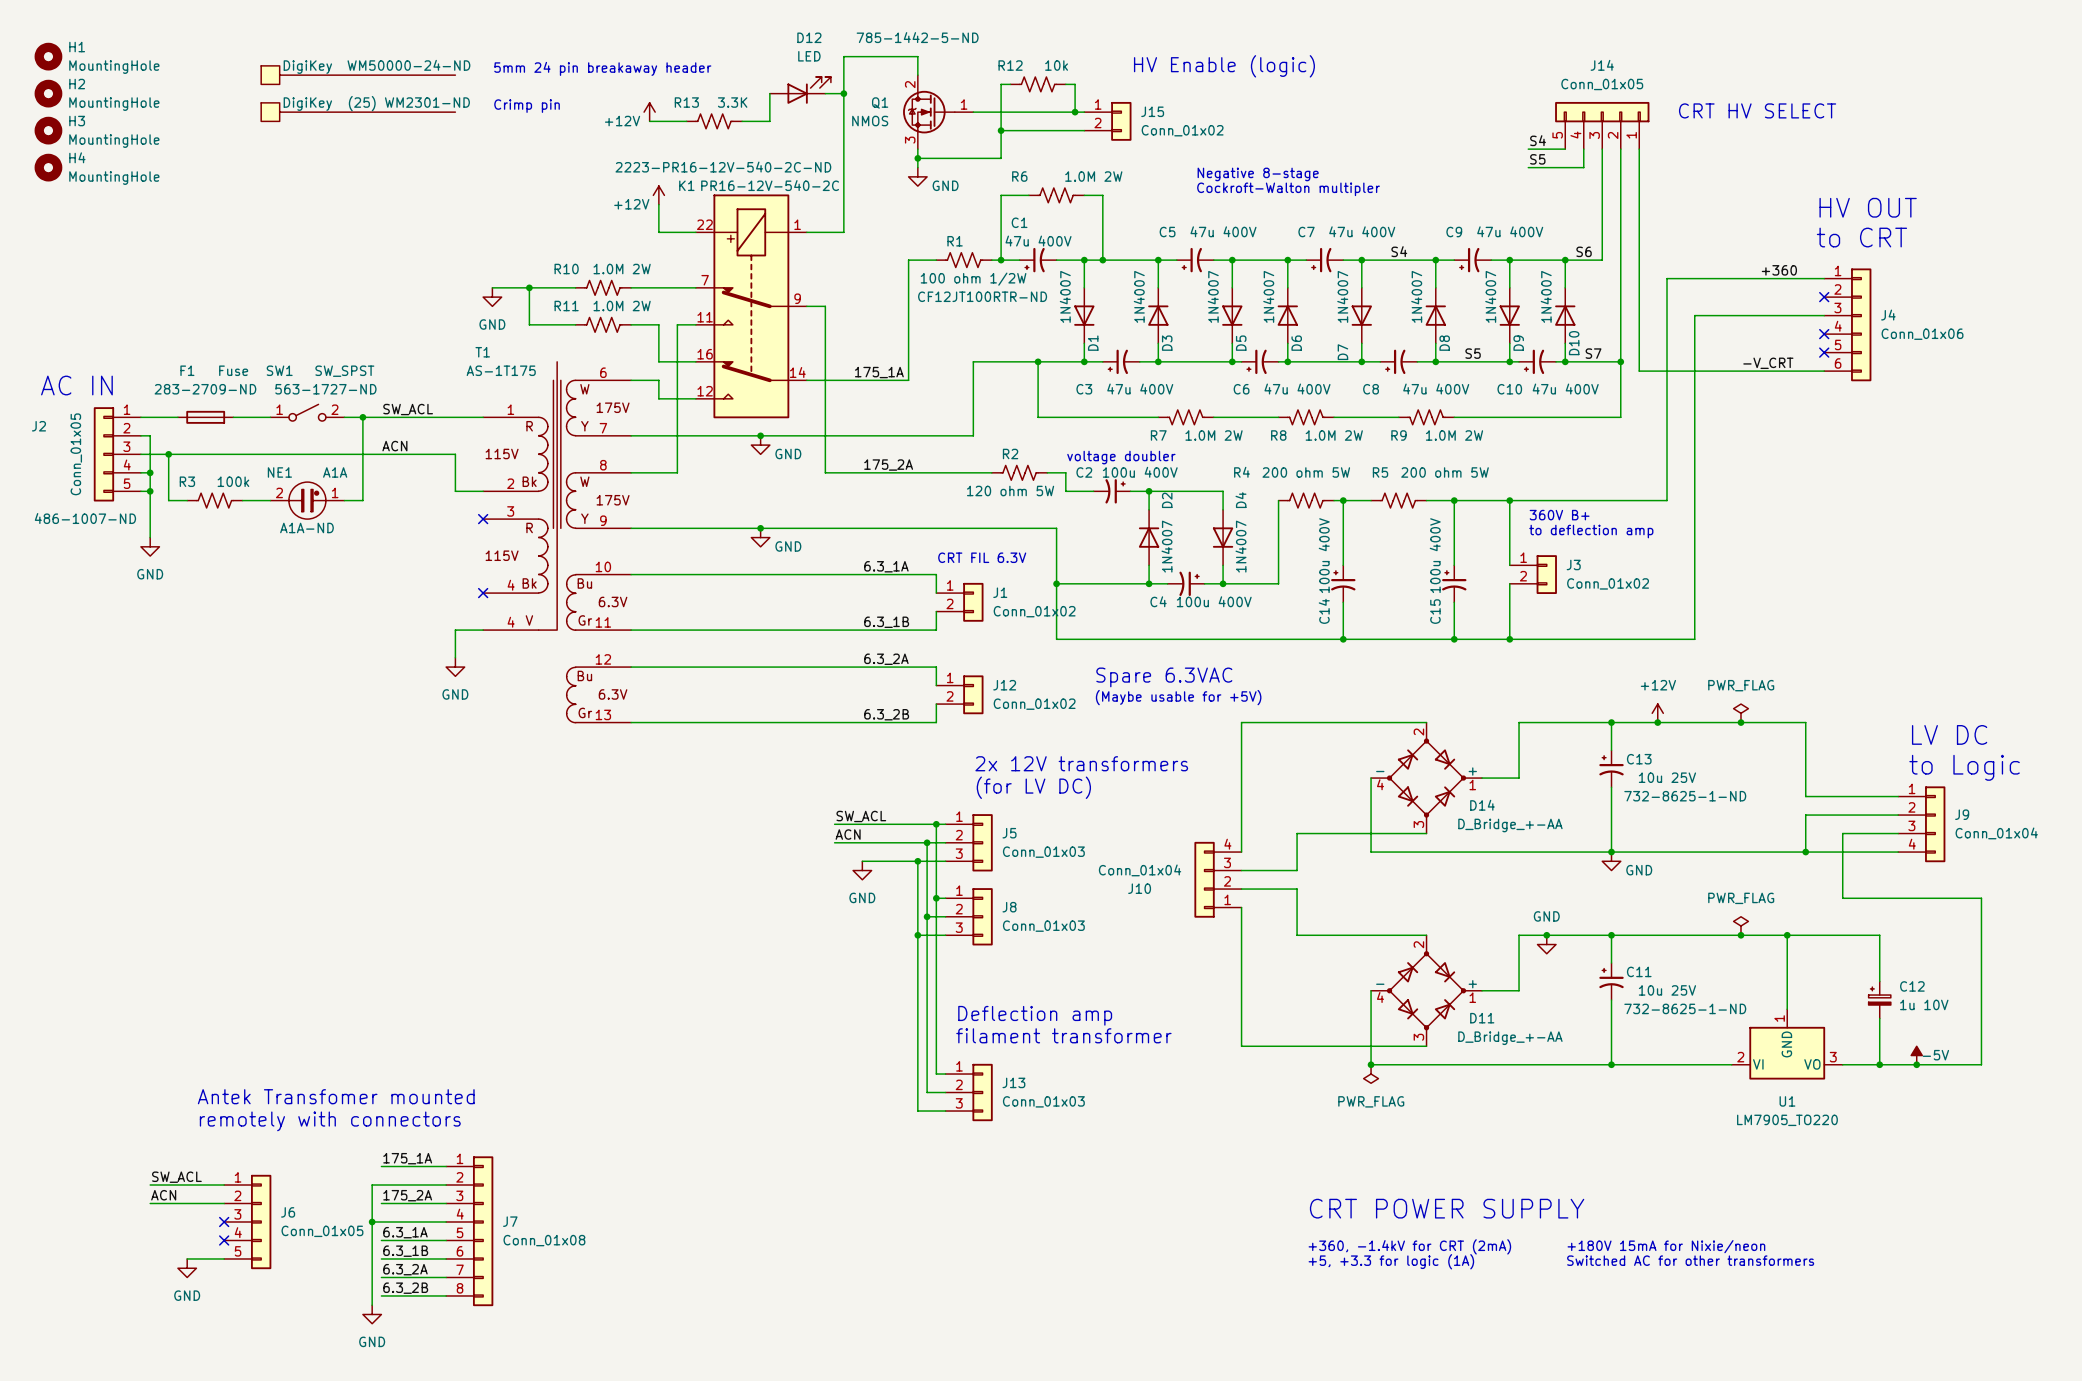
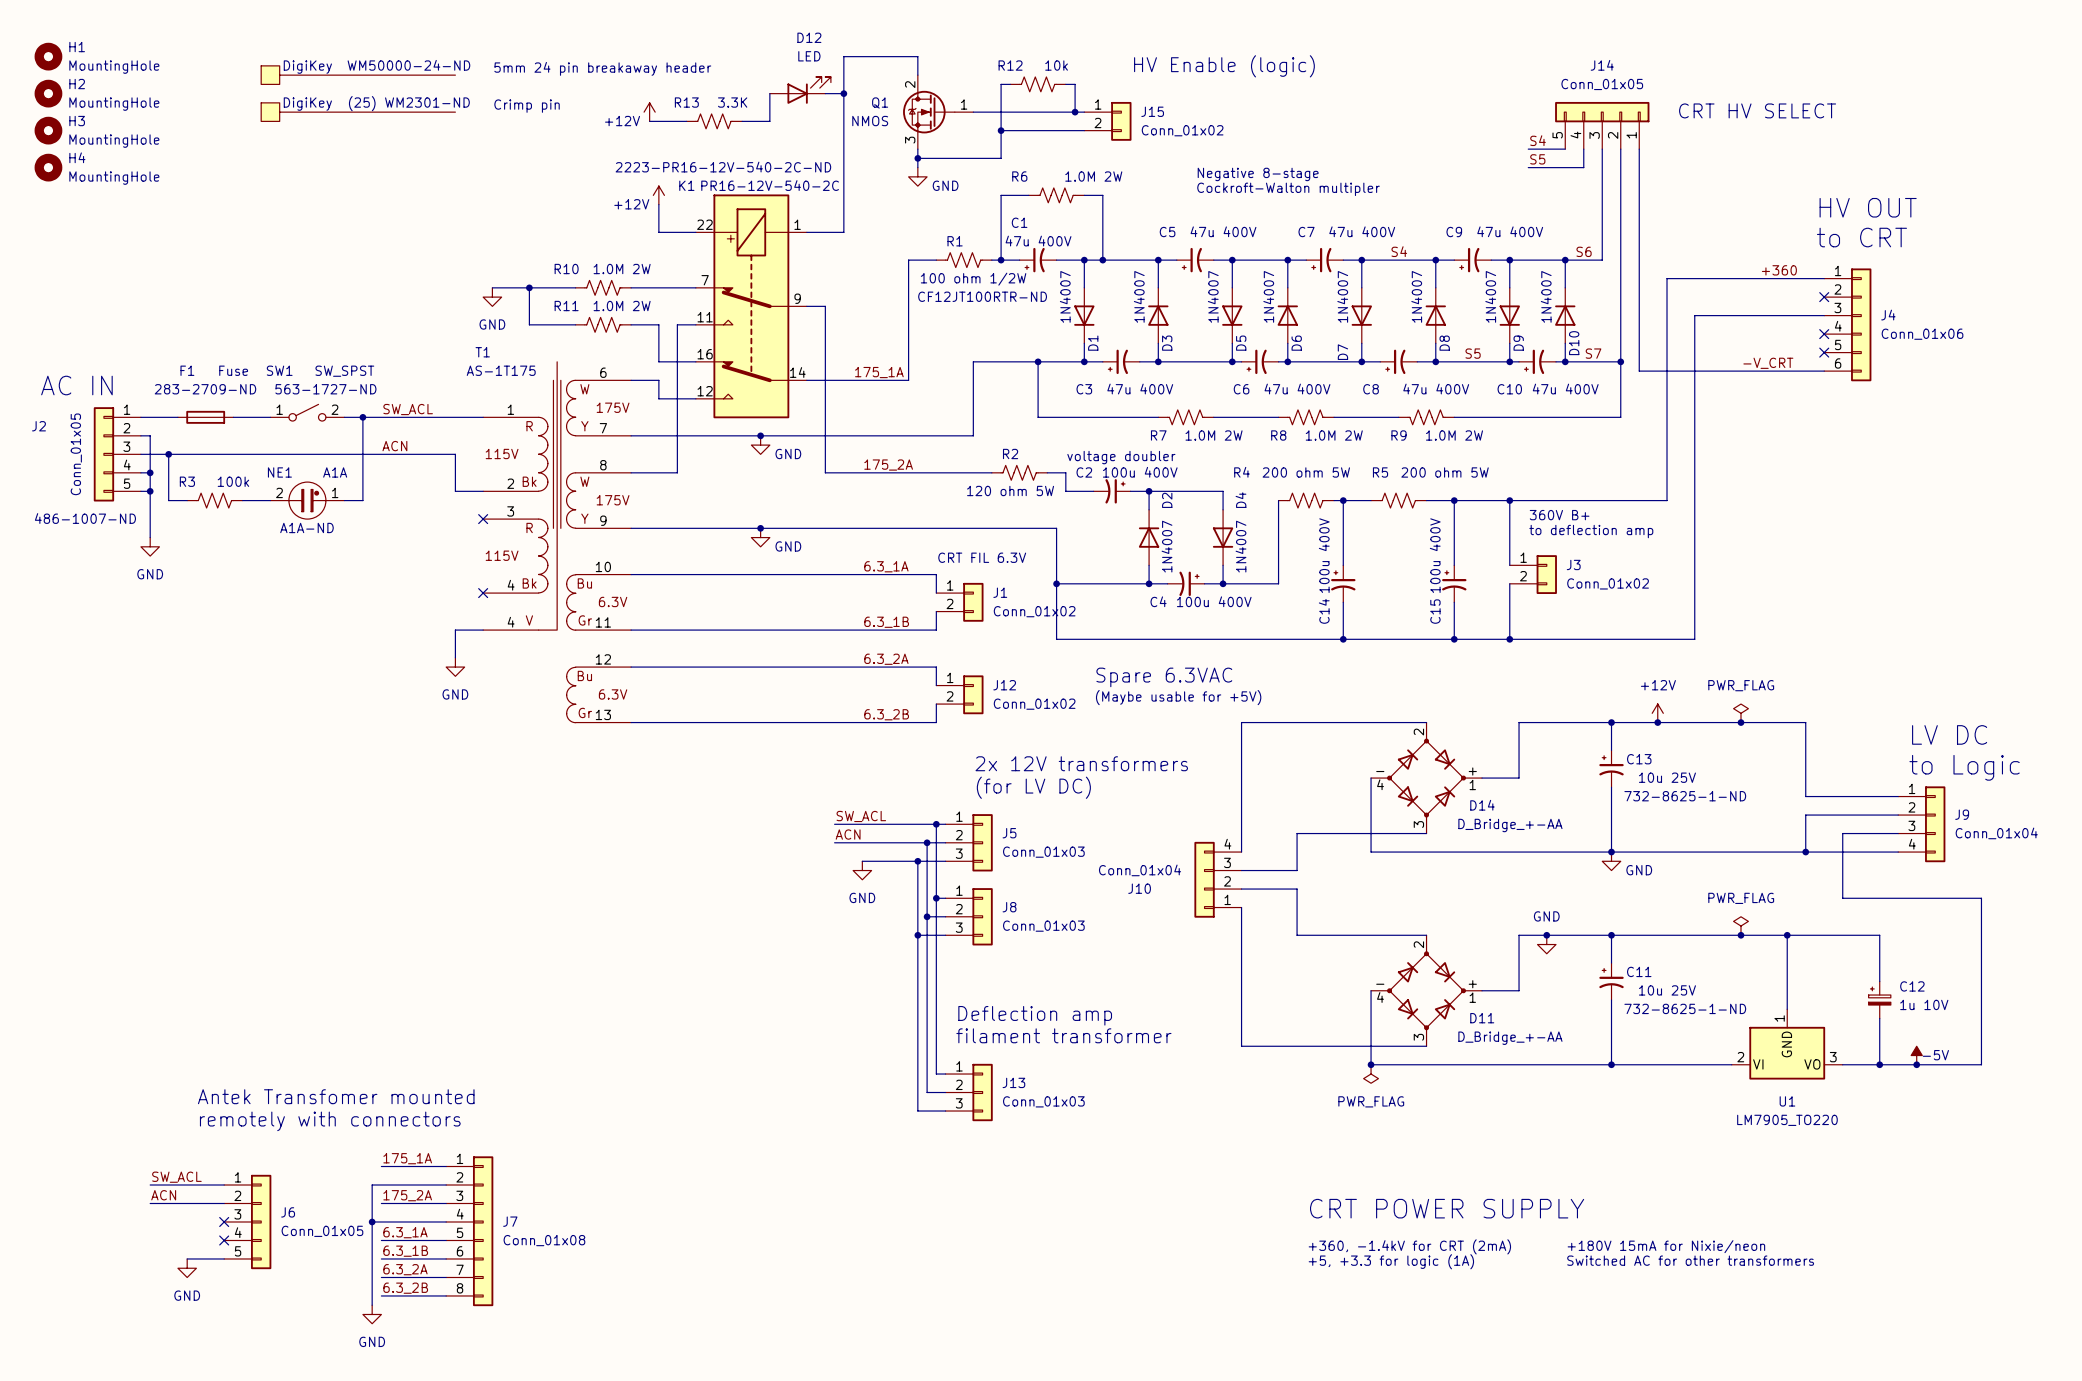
Q1 text: 785-1442-5-ND (917, 37) -> none

